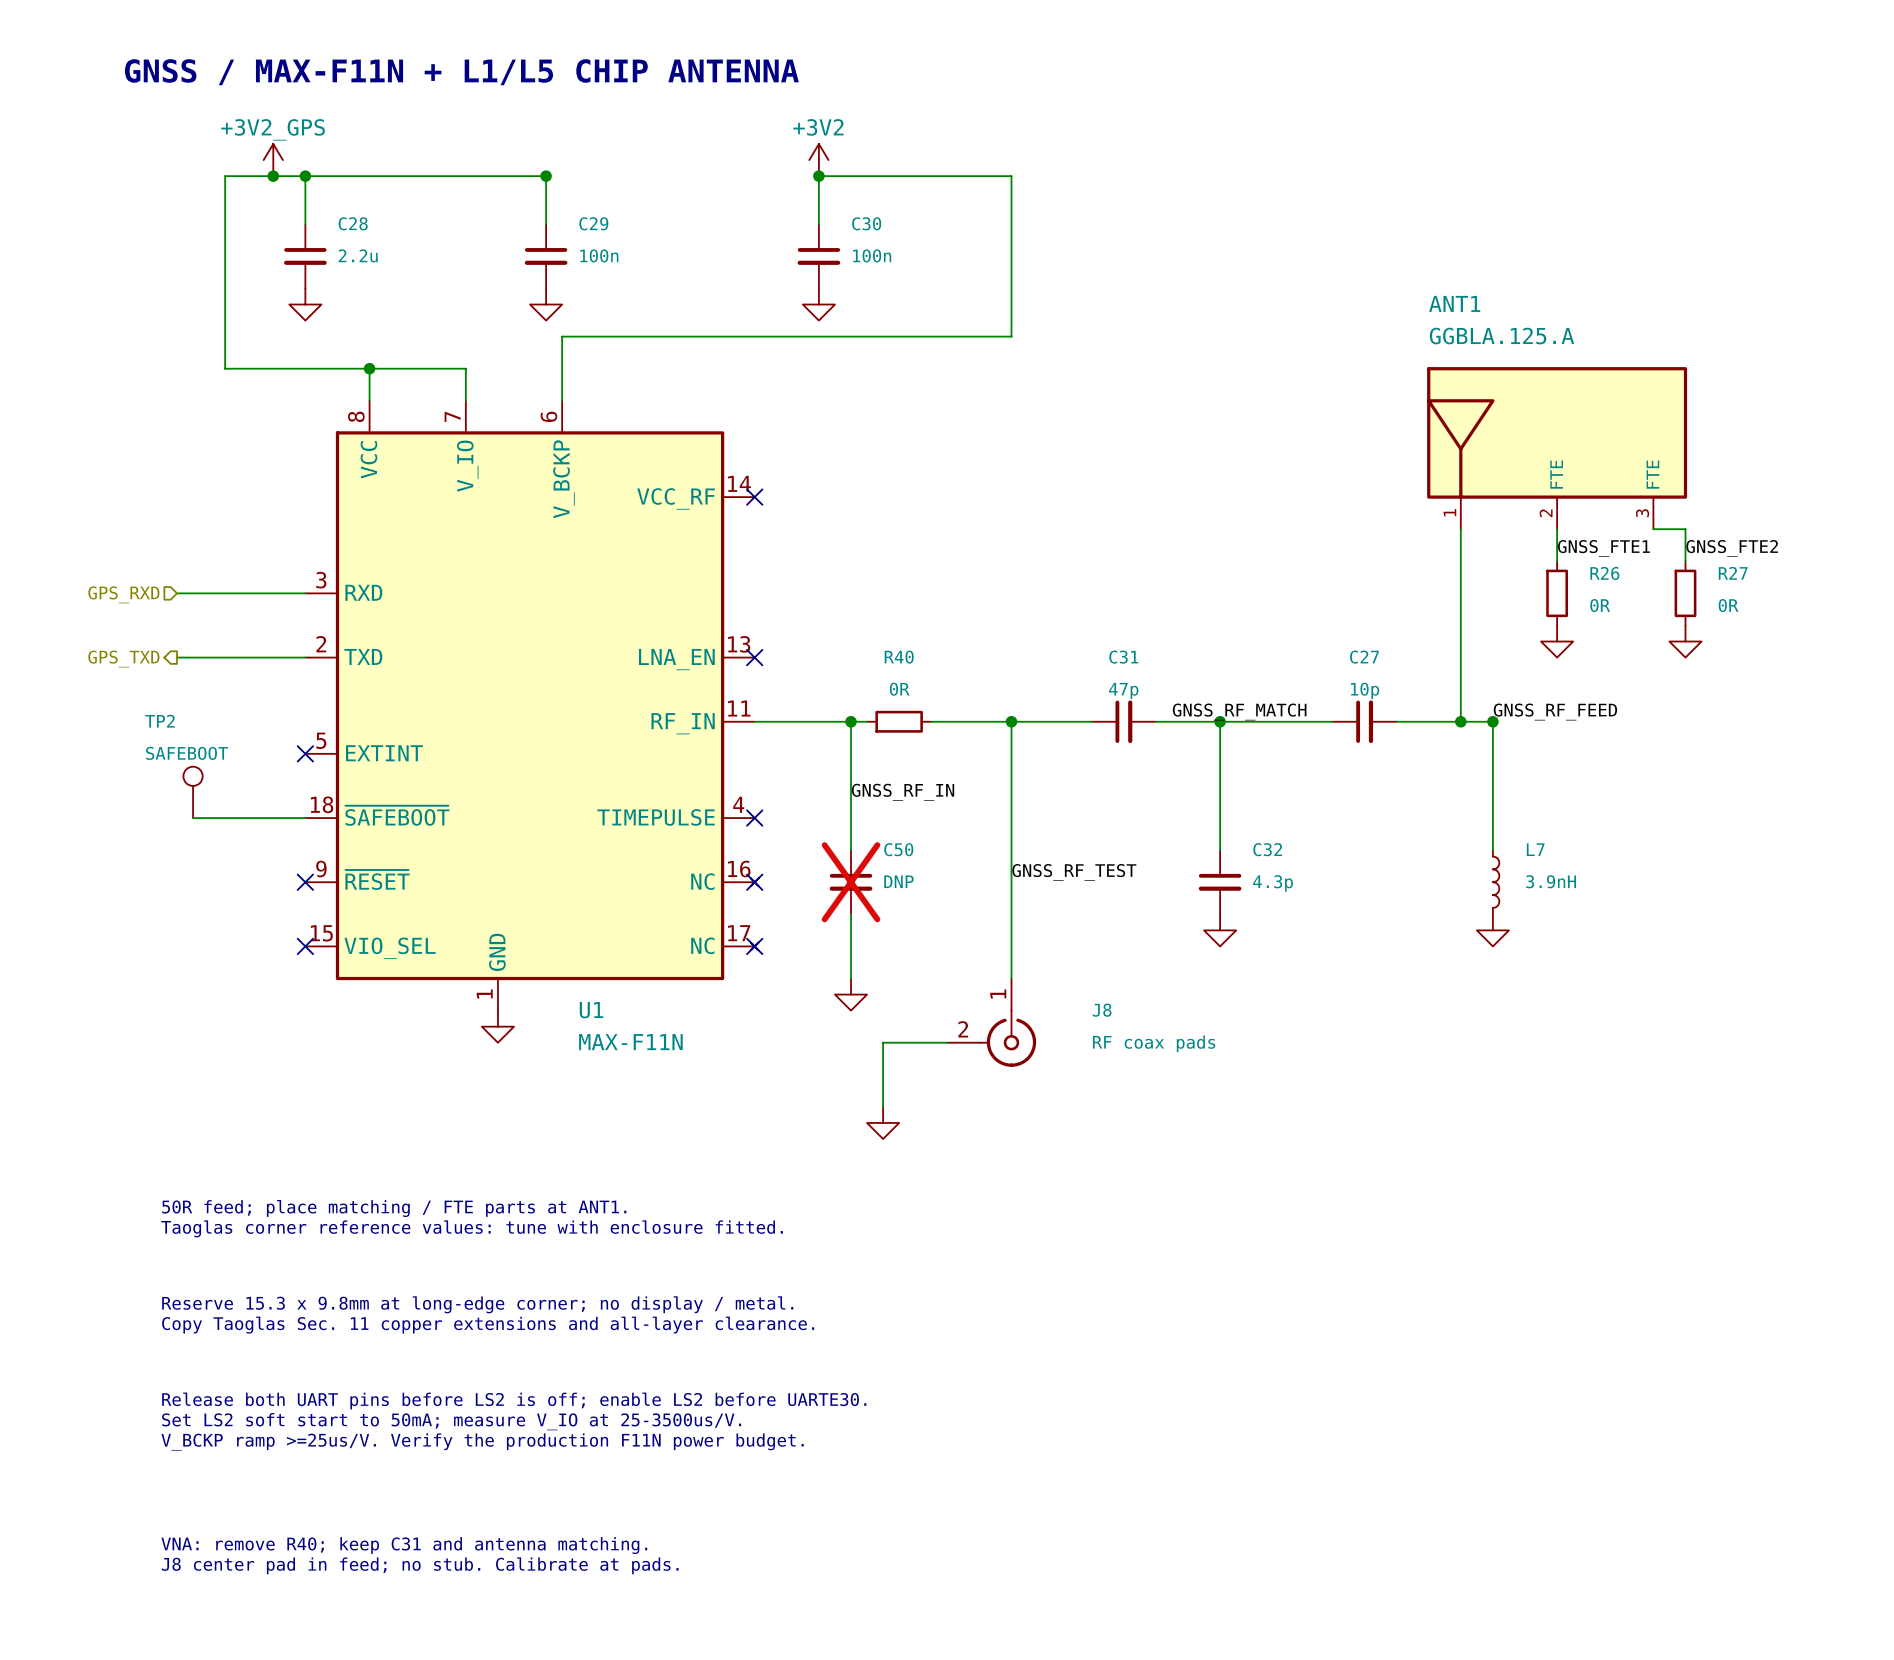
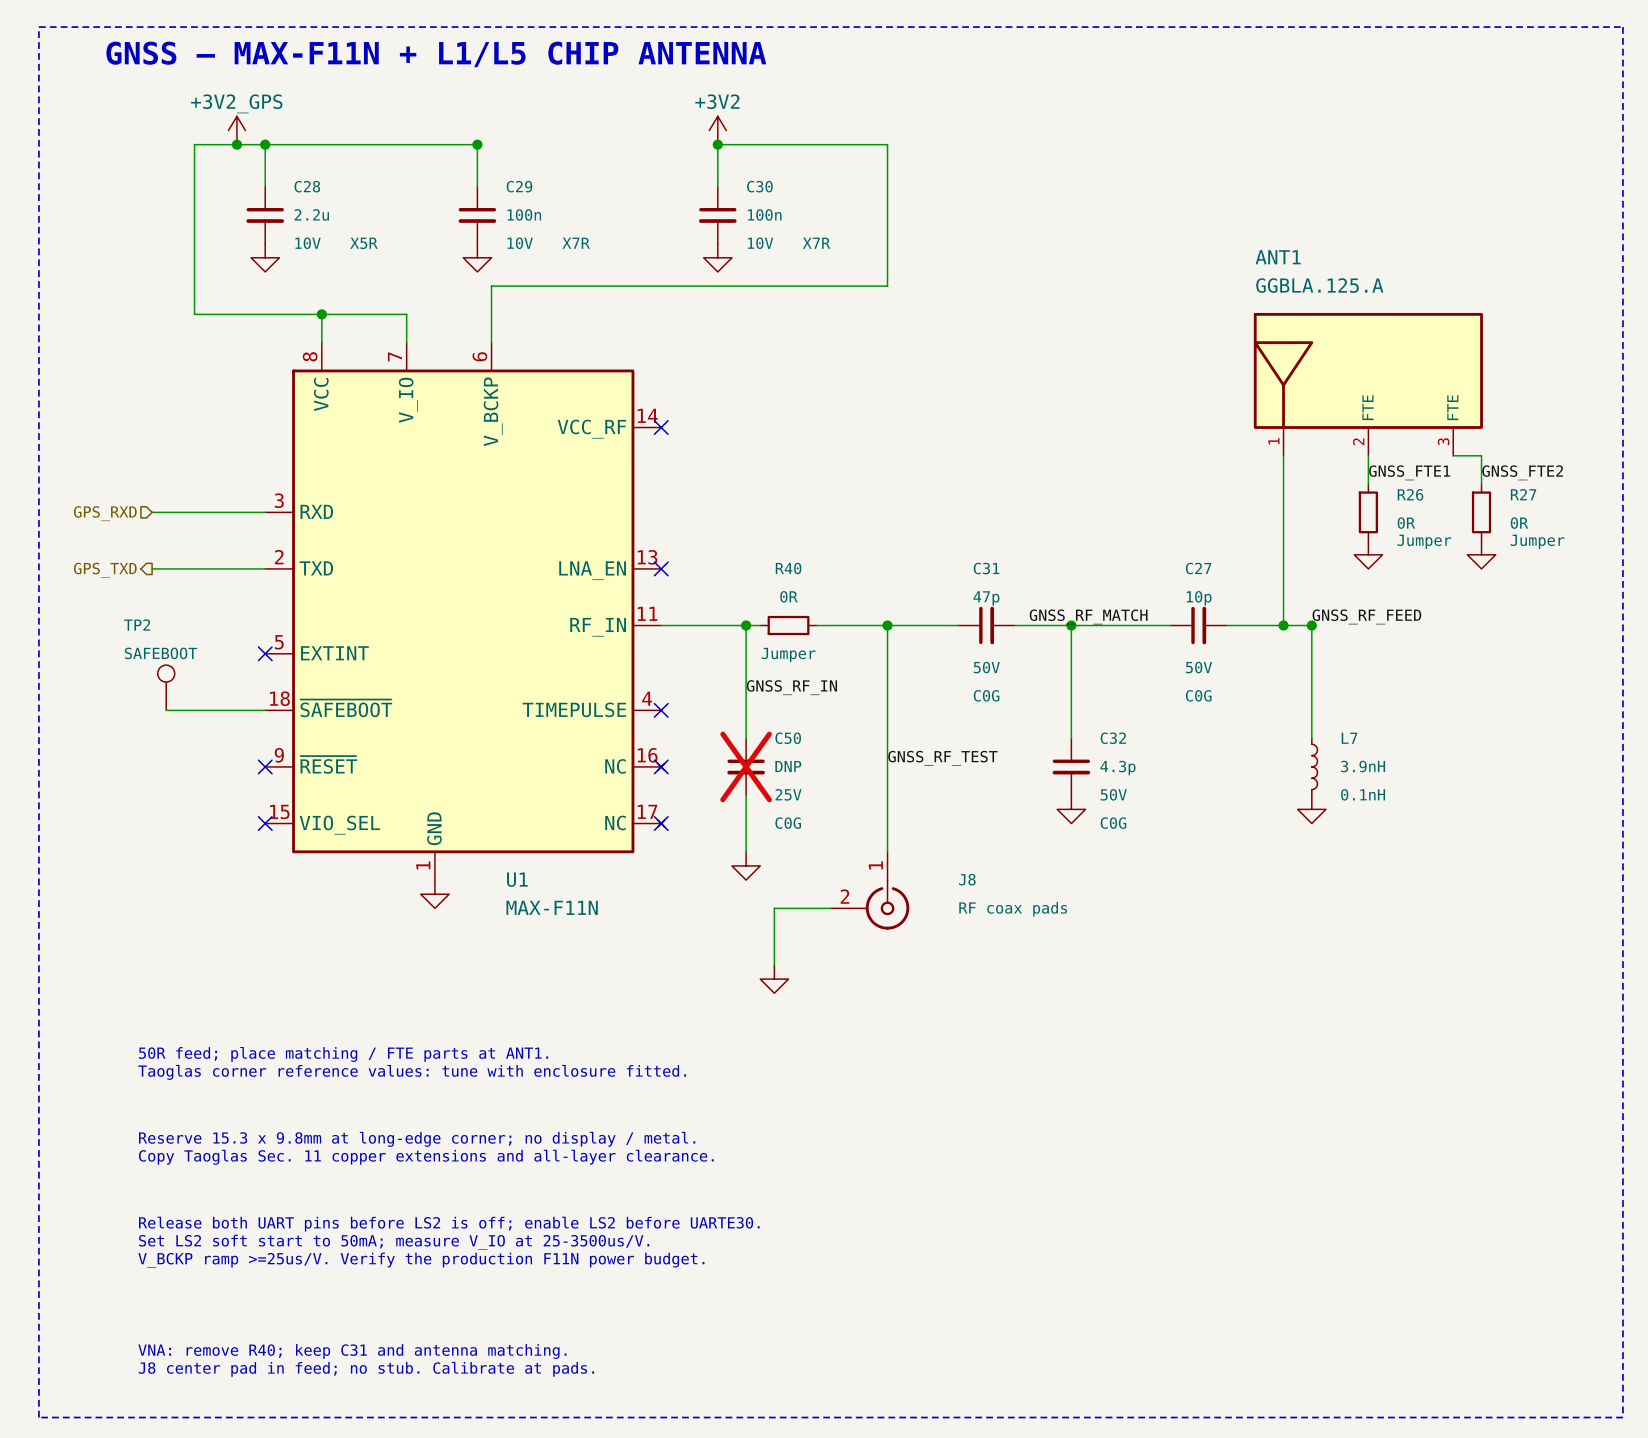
line: none -> (38, 27) (1622, 27) (1622, 1417) (38, 1417) (38, 27)
text: GNSS / MAX-F11N + L1/L5 CHIP ANTENNA (461, 72) -> GNSS — MAX-F11N + L1/L5 CHIP ANTENNA (436, 54)
C28 text: none -> 10V (308, 243)
C28 text: none -> X5R (363, 243)
C29 text: none -> 10V (520, 243)
C29 text: none -> X7R (576, 243)
C30 text: none -> 10V (760, 243)
C30 text: none -> X7R (816, 243)
R26 text: none -> Jumper (1424, 541)
R27 text: none -> Jumper (1537, 541)
R40 text: none -> Jumper (788, 654)
C31 text: none -> 50V (986, 667)
C27 text: none -> 50V (1198, 667)
C31 text: none -> C0G (986, 695)
C27 text: none -> C0G (1198, 695)
C50 text: none -> 25V (788, 794)
C32 text: none -> 50V (1113, 794)
L7 text: none -> 0.1nH (1363, 794)
C50 text: none -> C0G (788, 823)
C32 text: none -> C0G (1113, 823)

